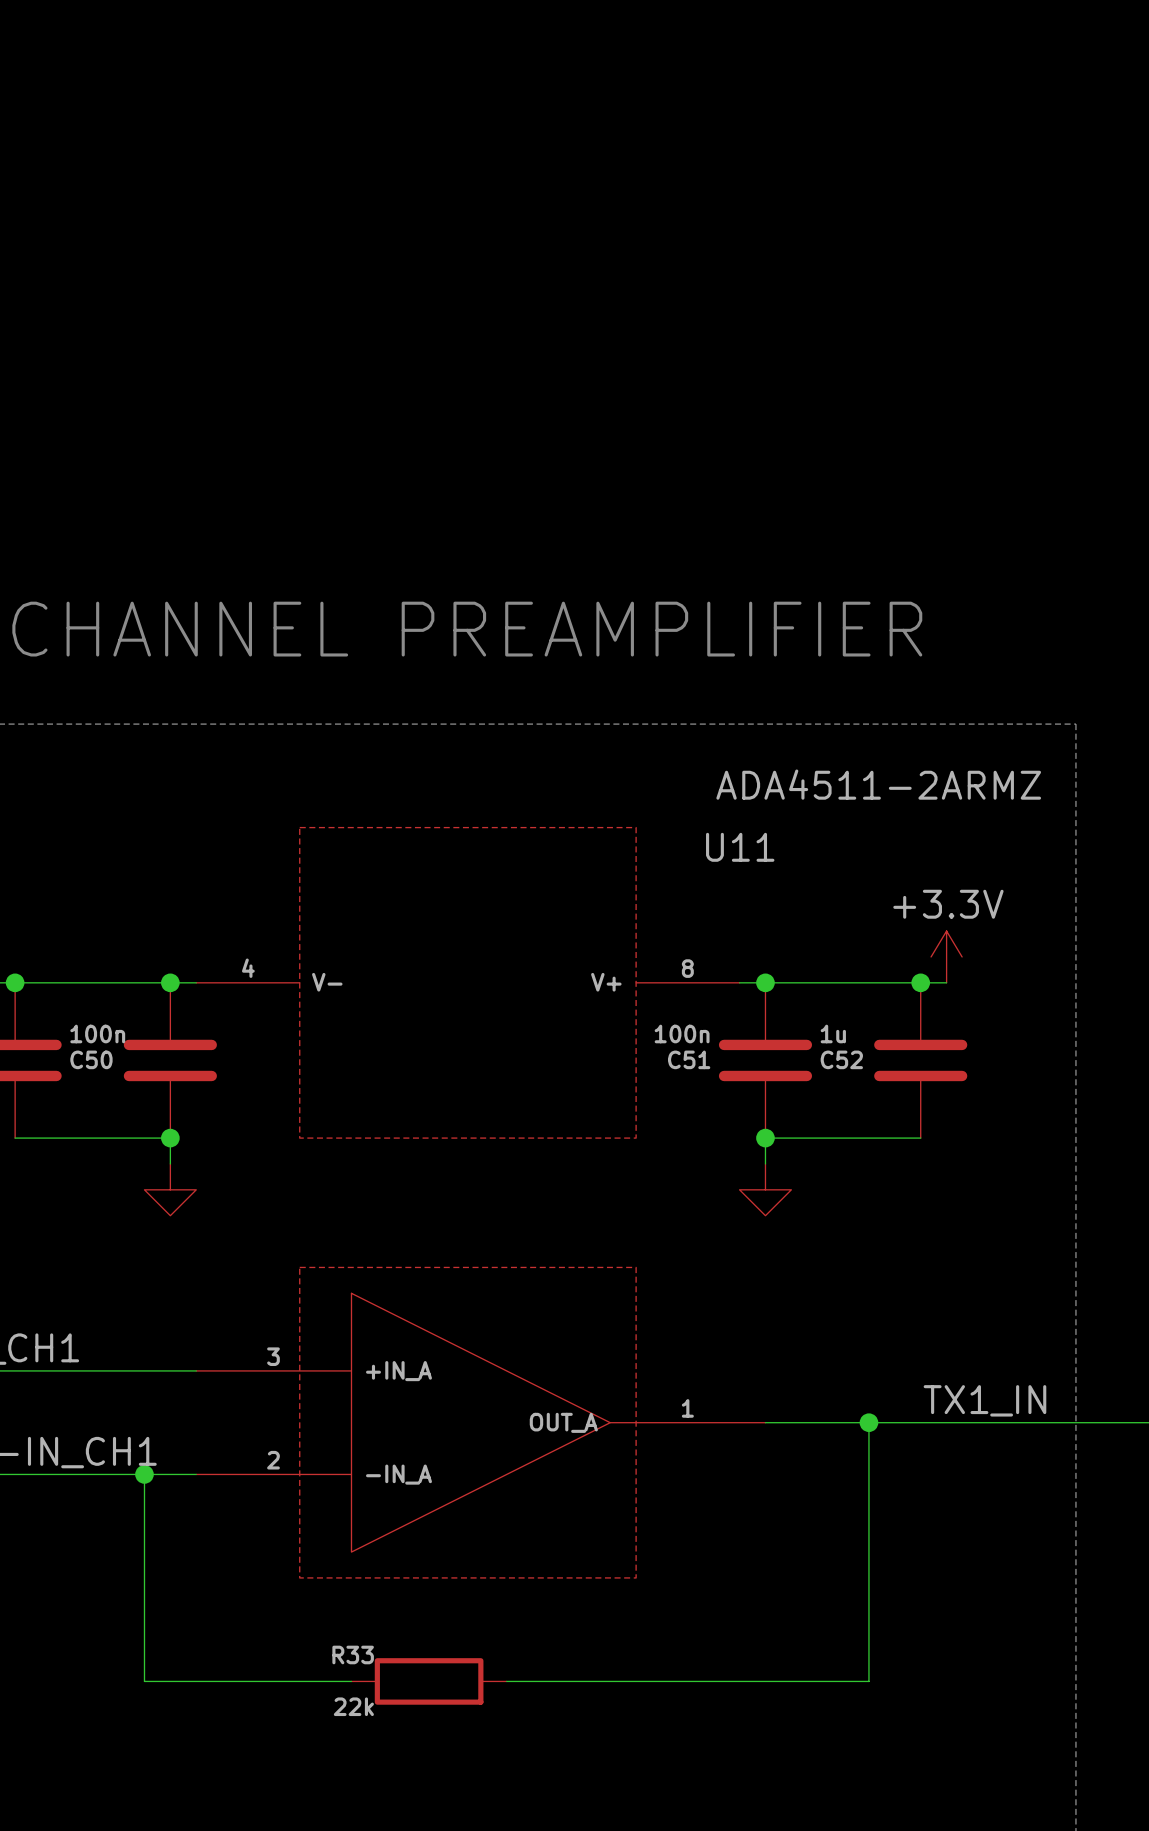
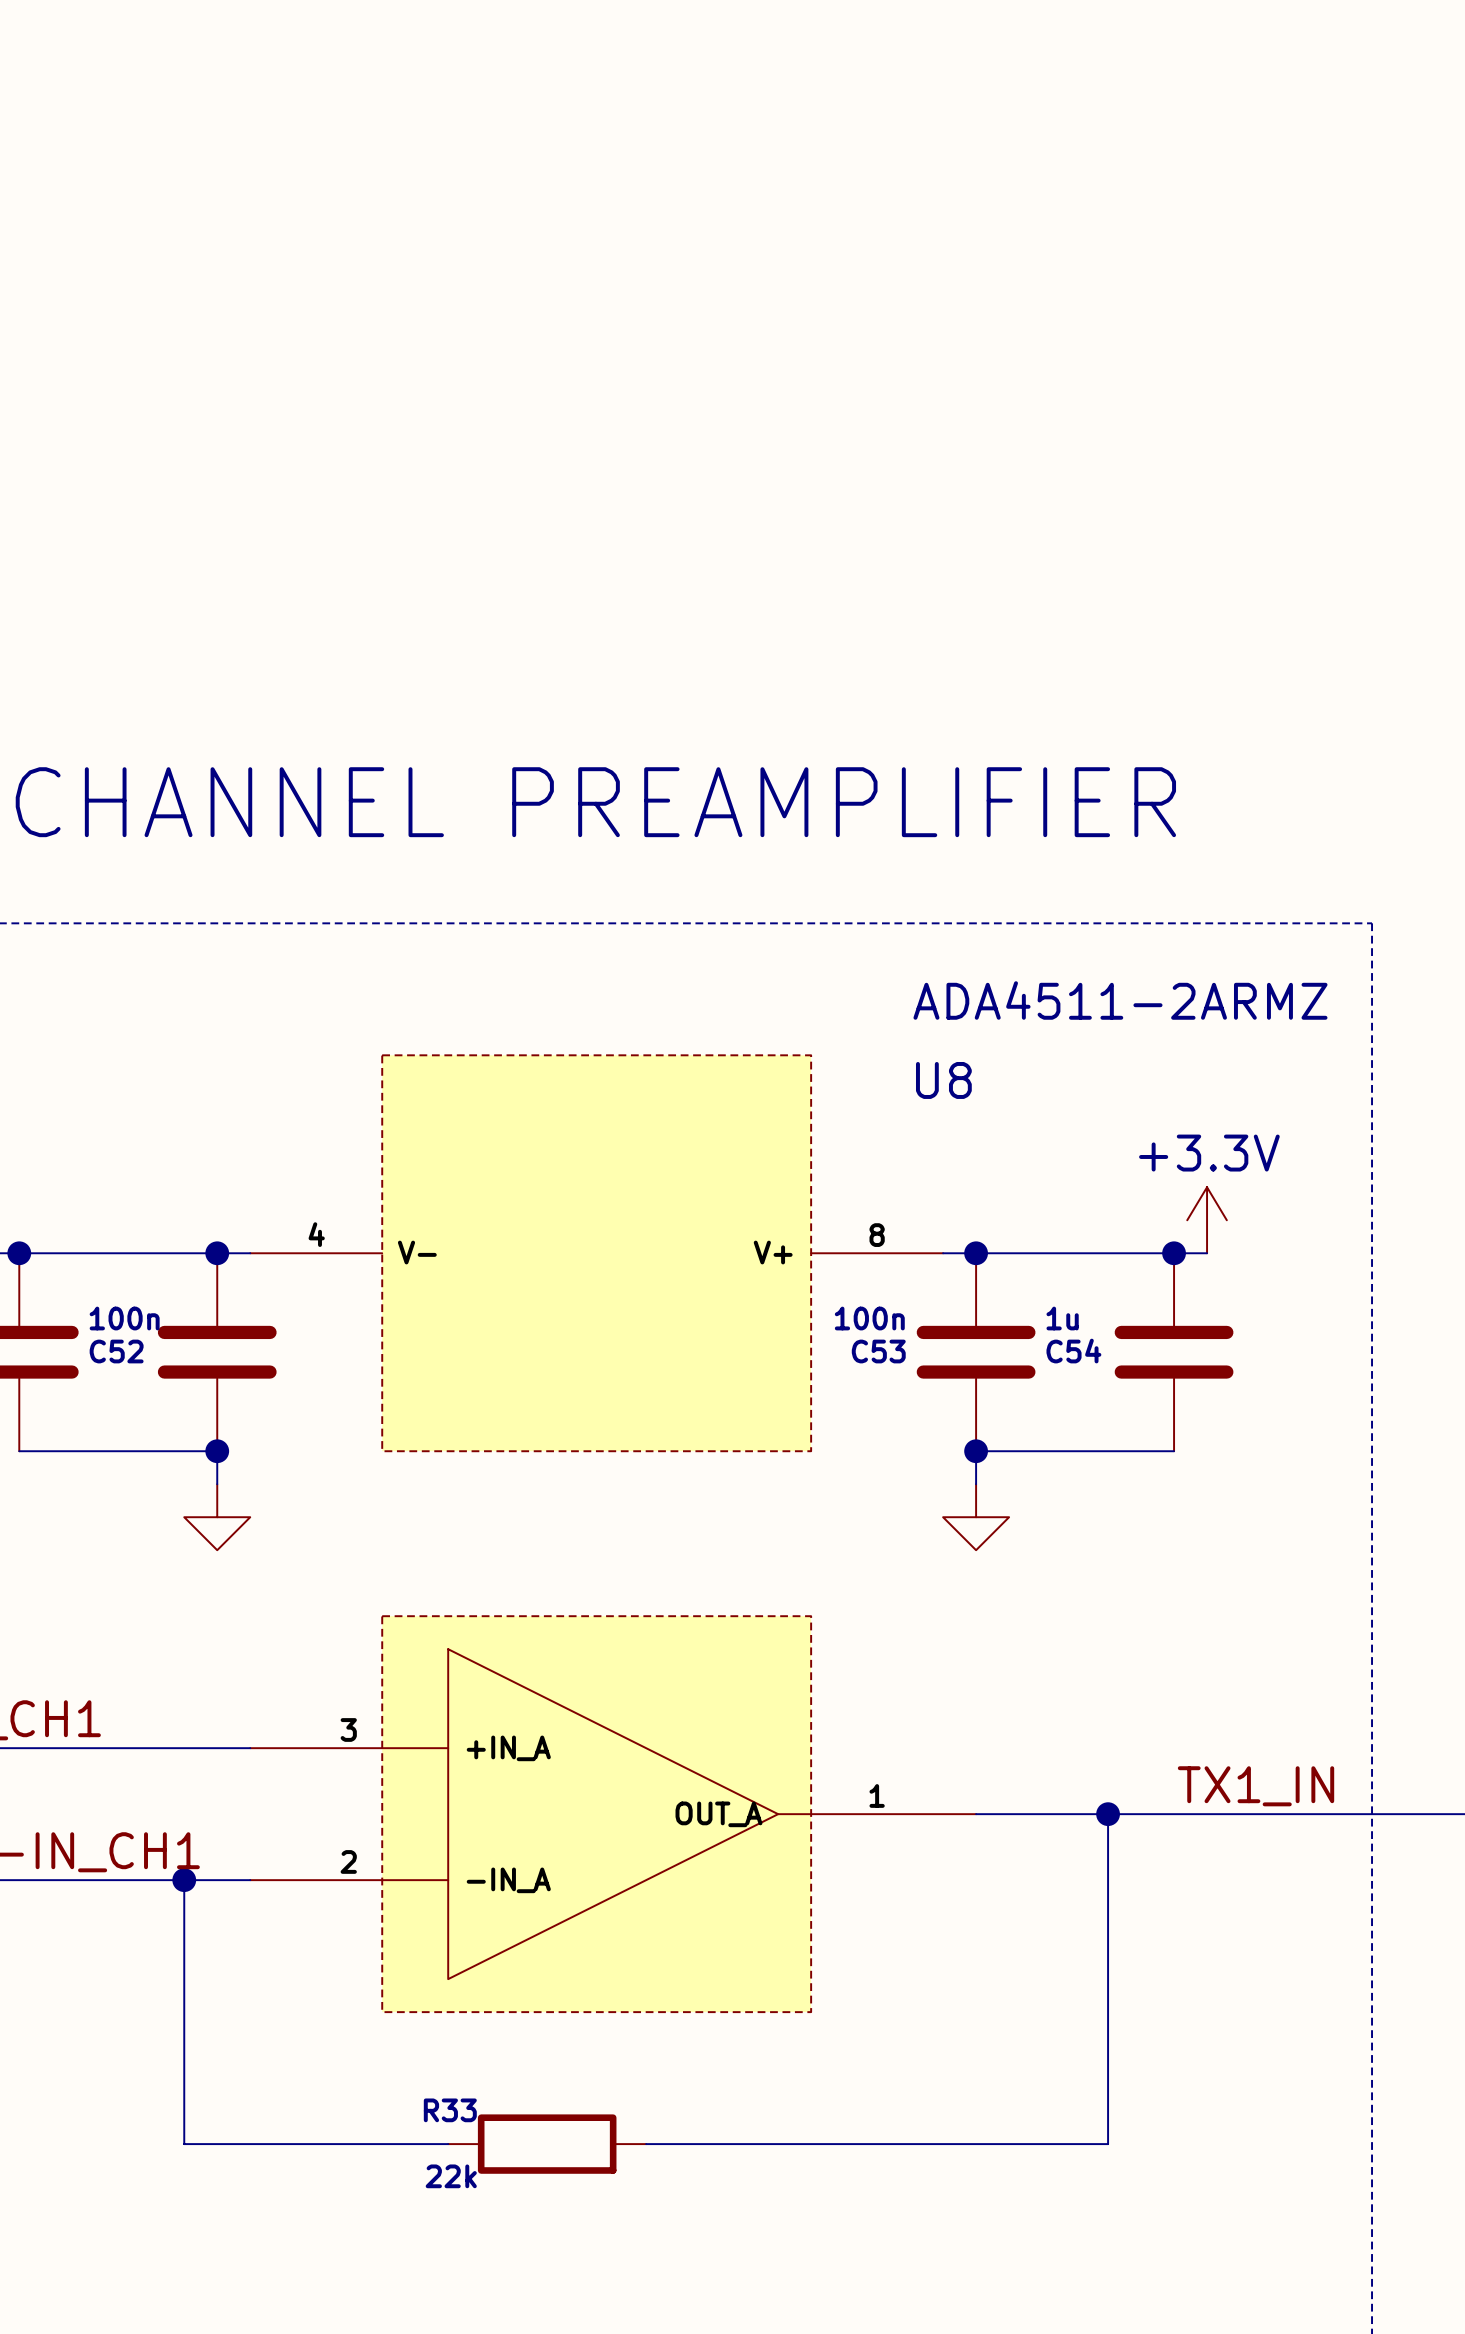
U11 name: U11 (740, 847) -> U8 (943, 1080)
C50 name: C50 (91, 1059) -> C52 (116, 1351)
C51 name: C51 (689, 1059) -> C53 (878, 1351)
C52 name: C52 (841, 1059) -> C54 (1073, 1351)

